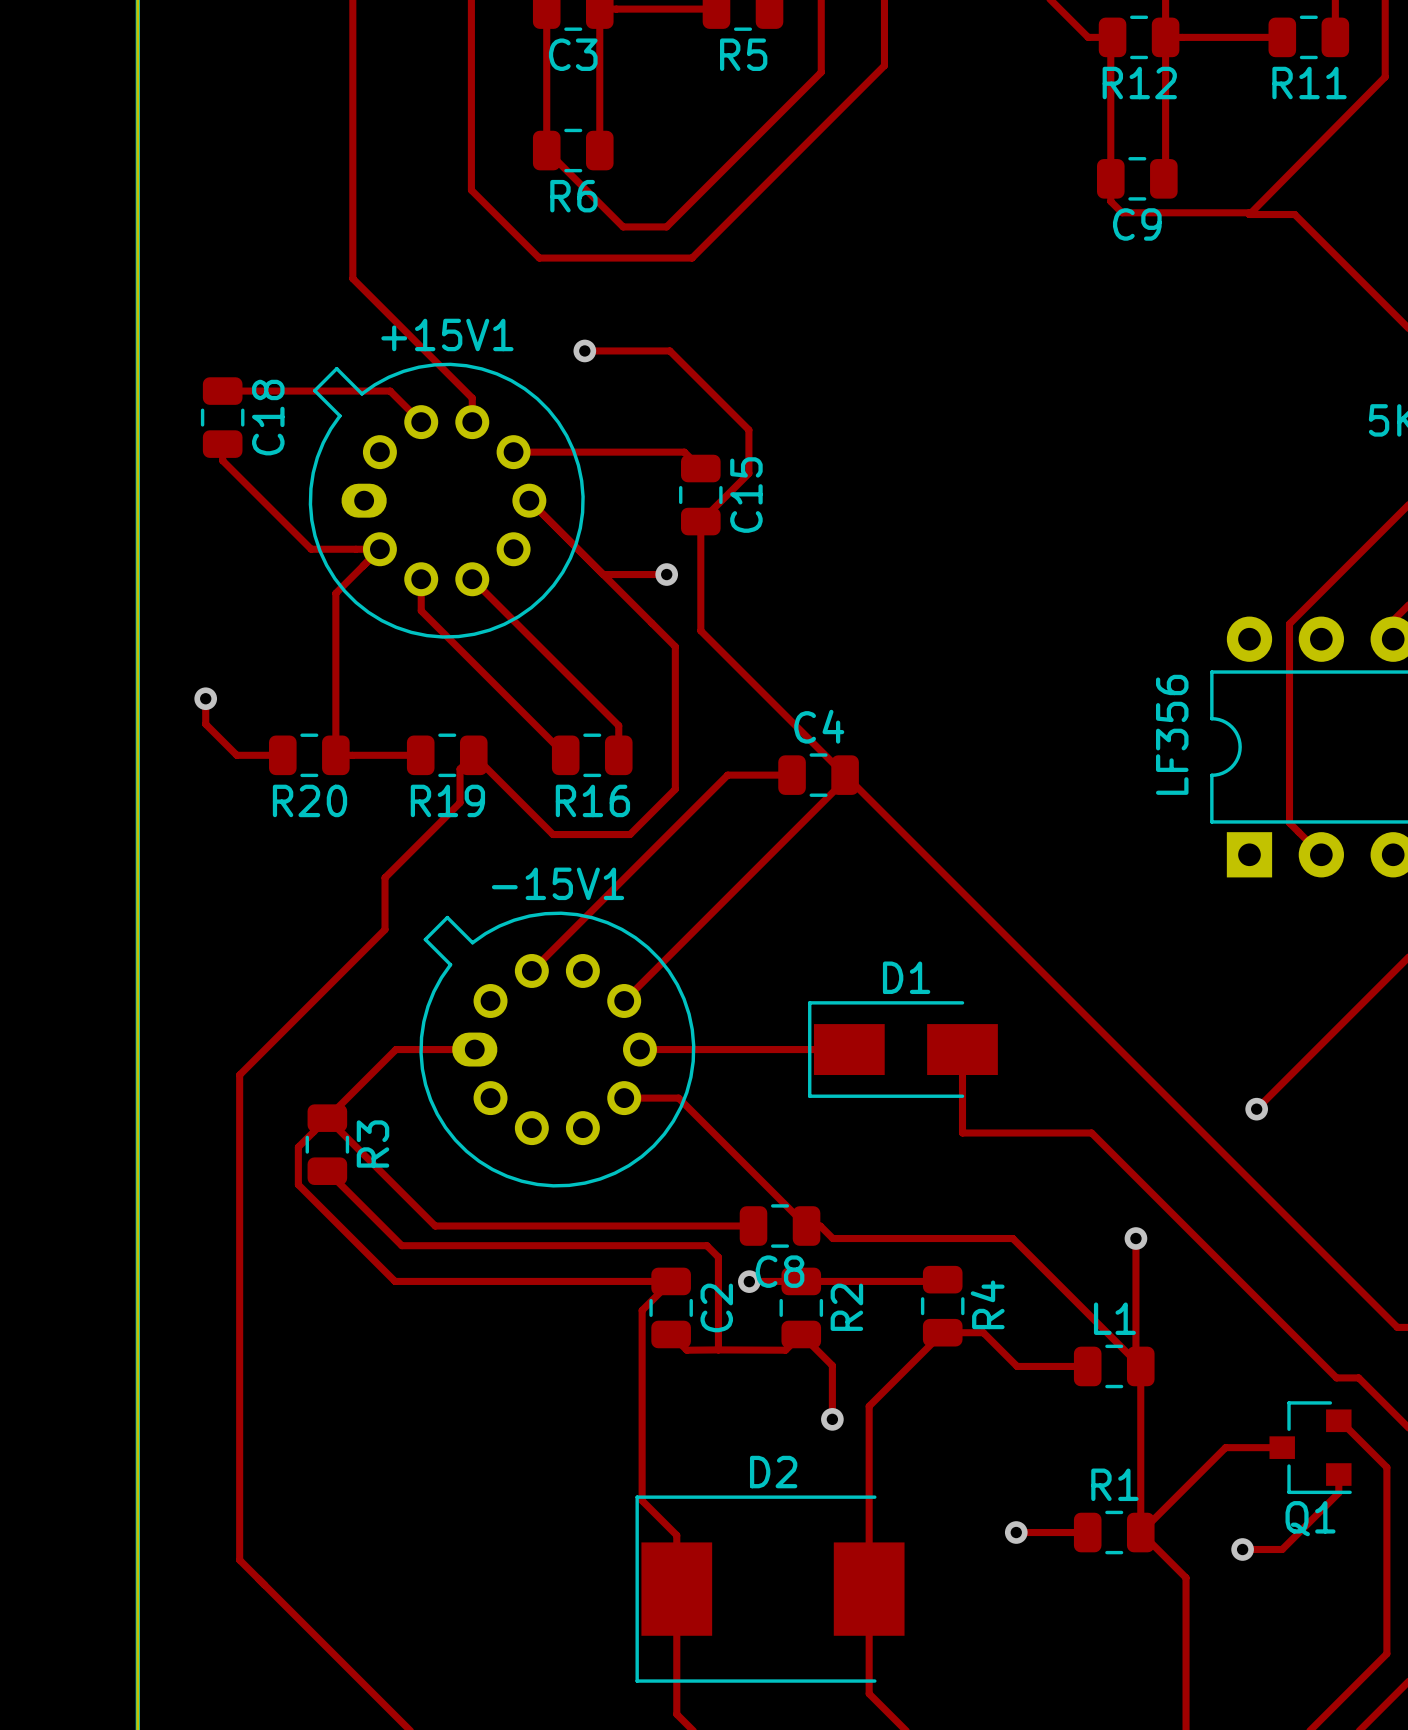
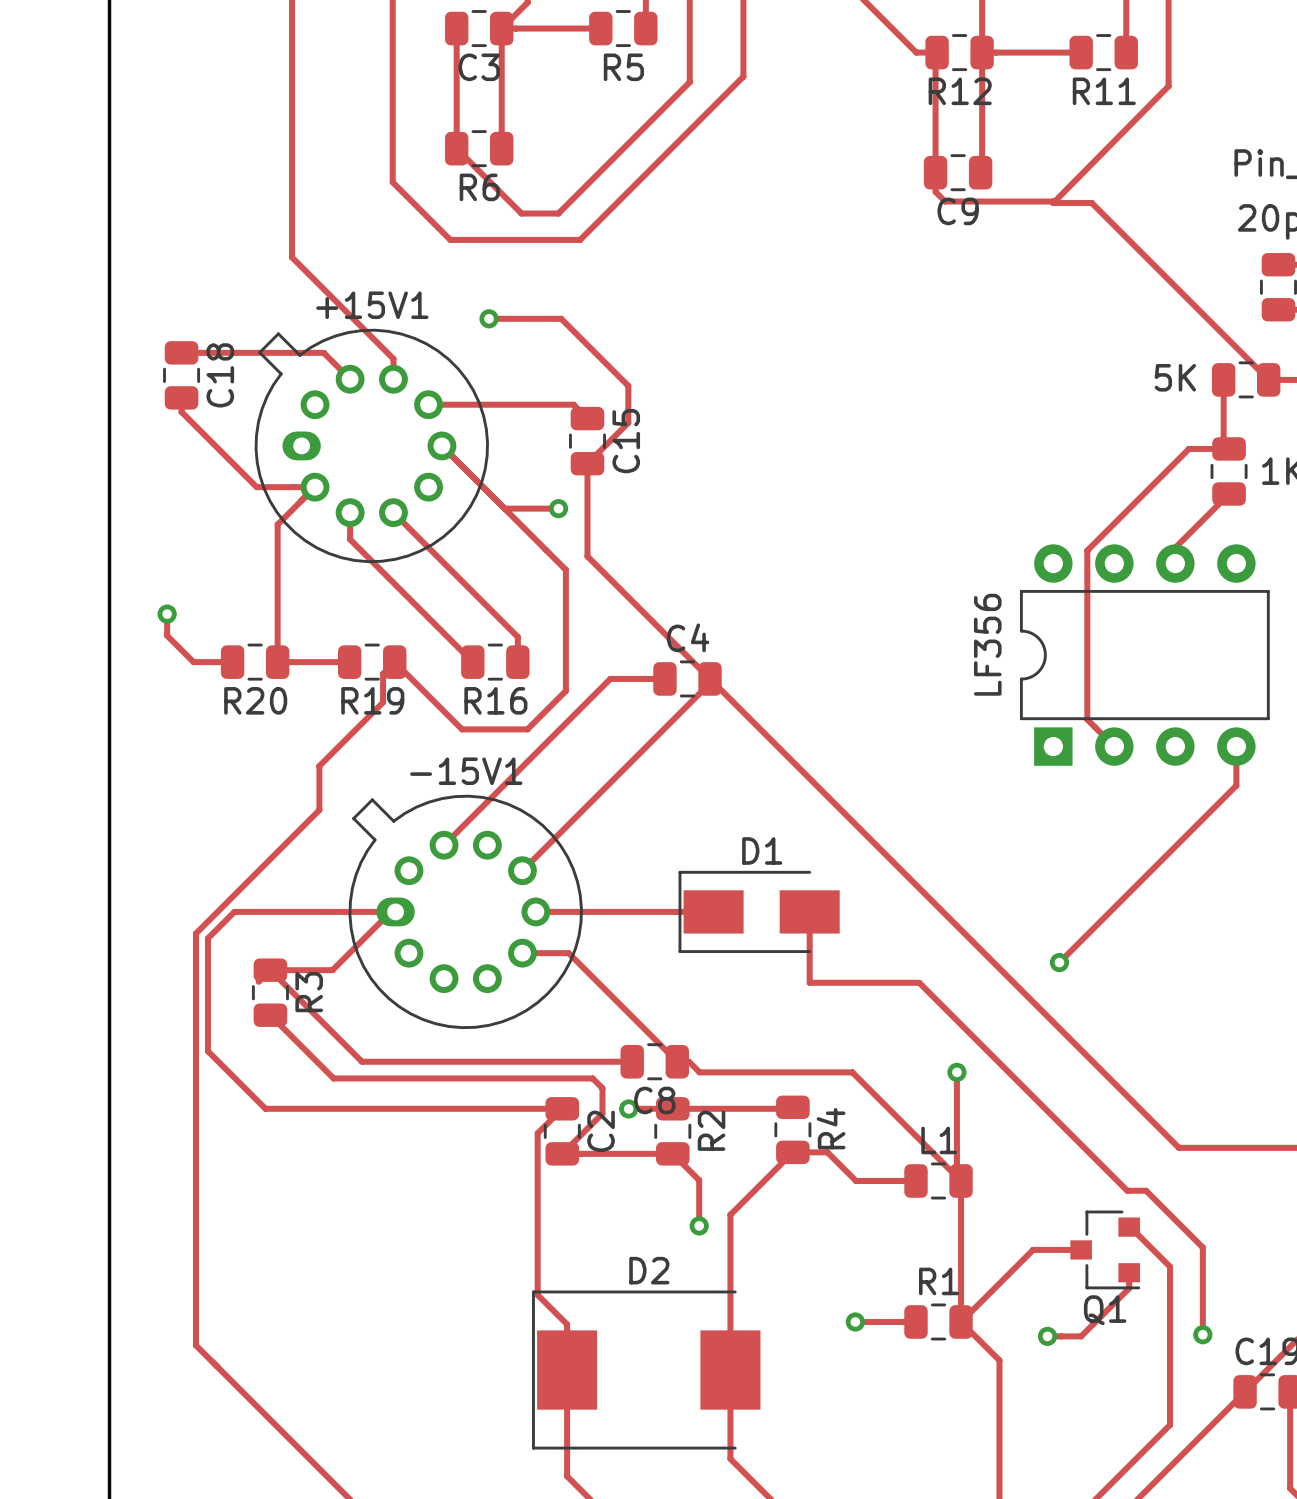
track: (395, 1049) (327, 1118) -> (390, 911) (332, 970) (270, 970)
track: (313, 1131) (298, 1147) (298, 1184) (395, 1281) -> (328, 911) (234, 911) (207, 938) (207, 1051) (265, 1108) (327, 1108)
track: (718, 1287) (718, 1349) -> none
track: (671, 1334) (686, 1350) (718, 1349) -> none
track: (801, 1334) (785, 1350) (718, 1349) -> (672, 1153) (562, 1153) (602, 1113)

